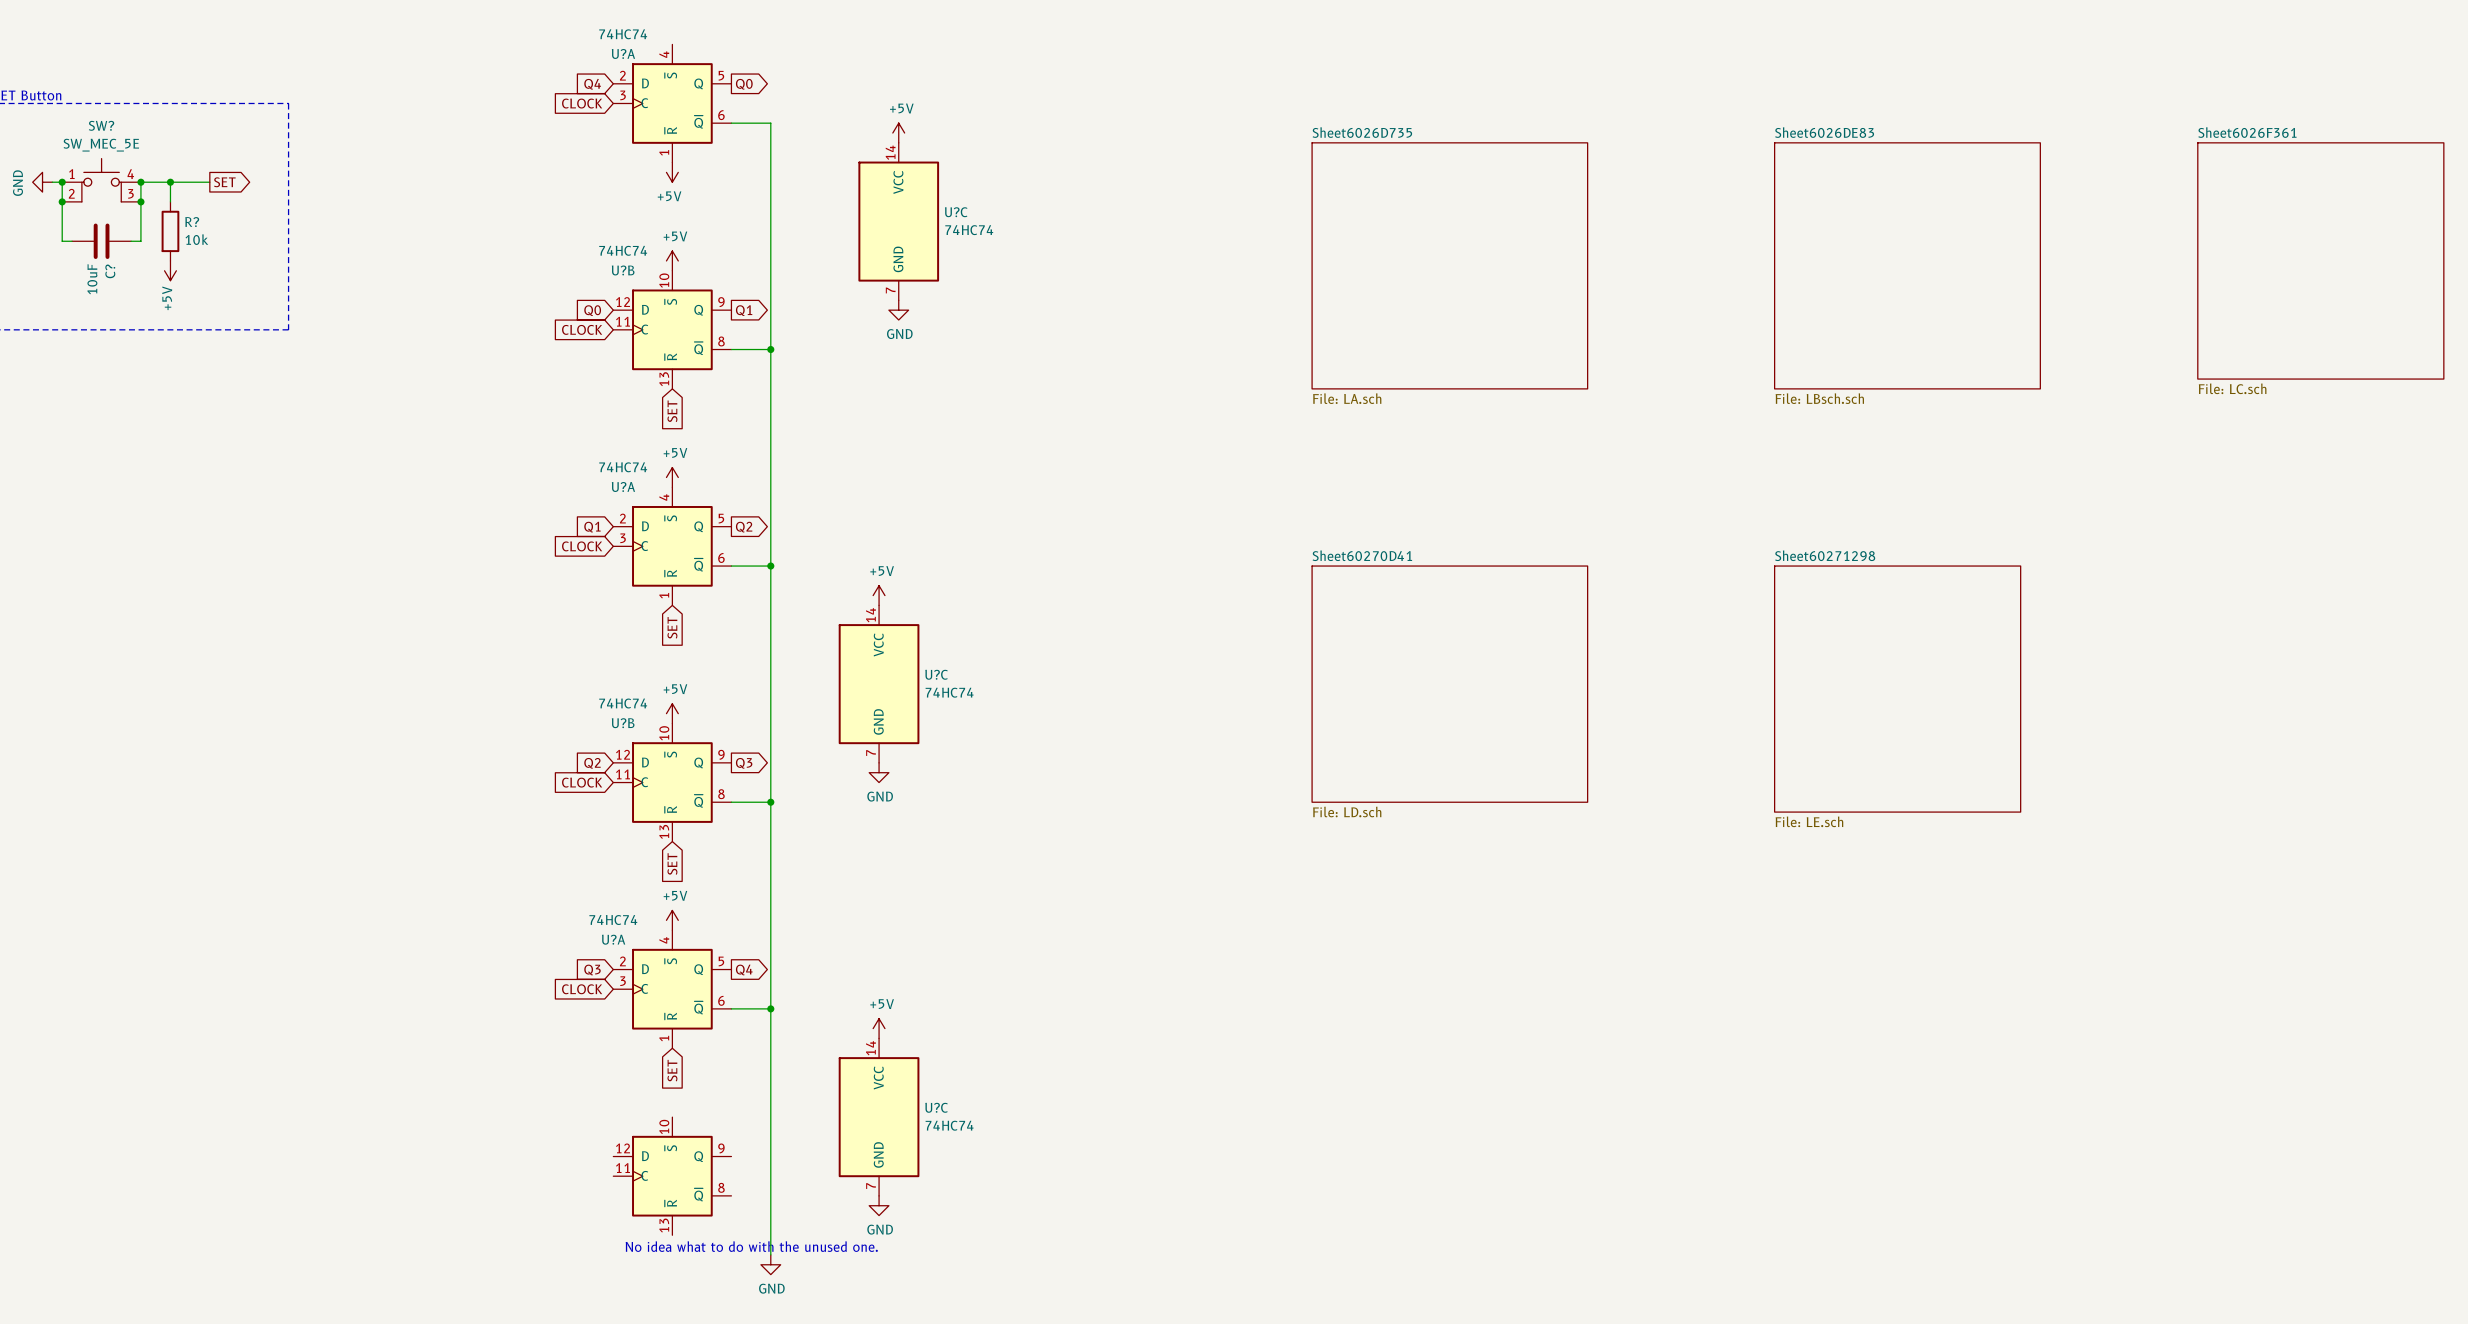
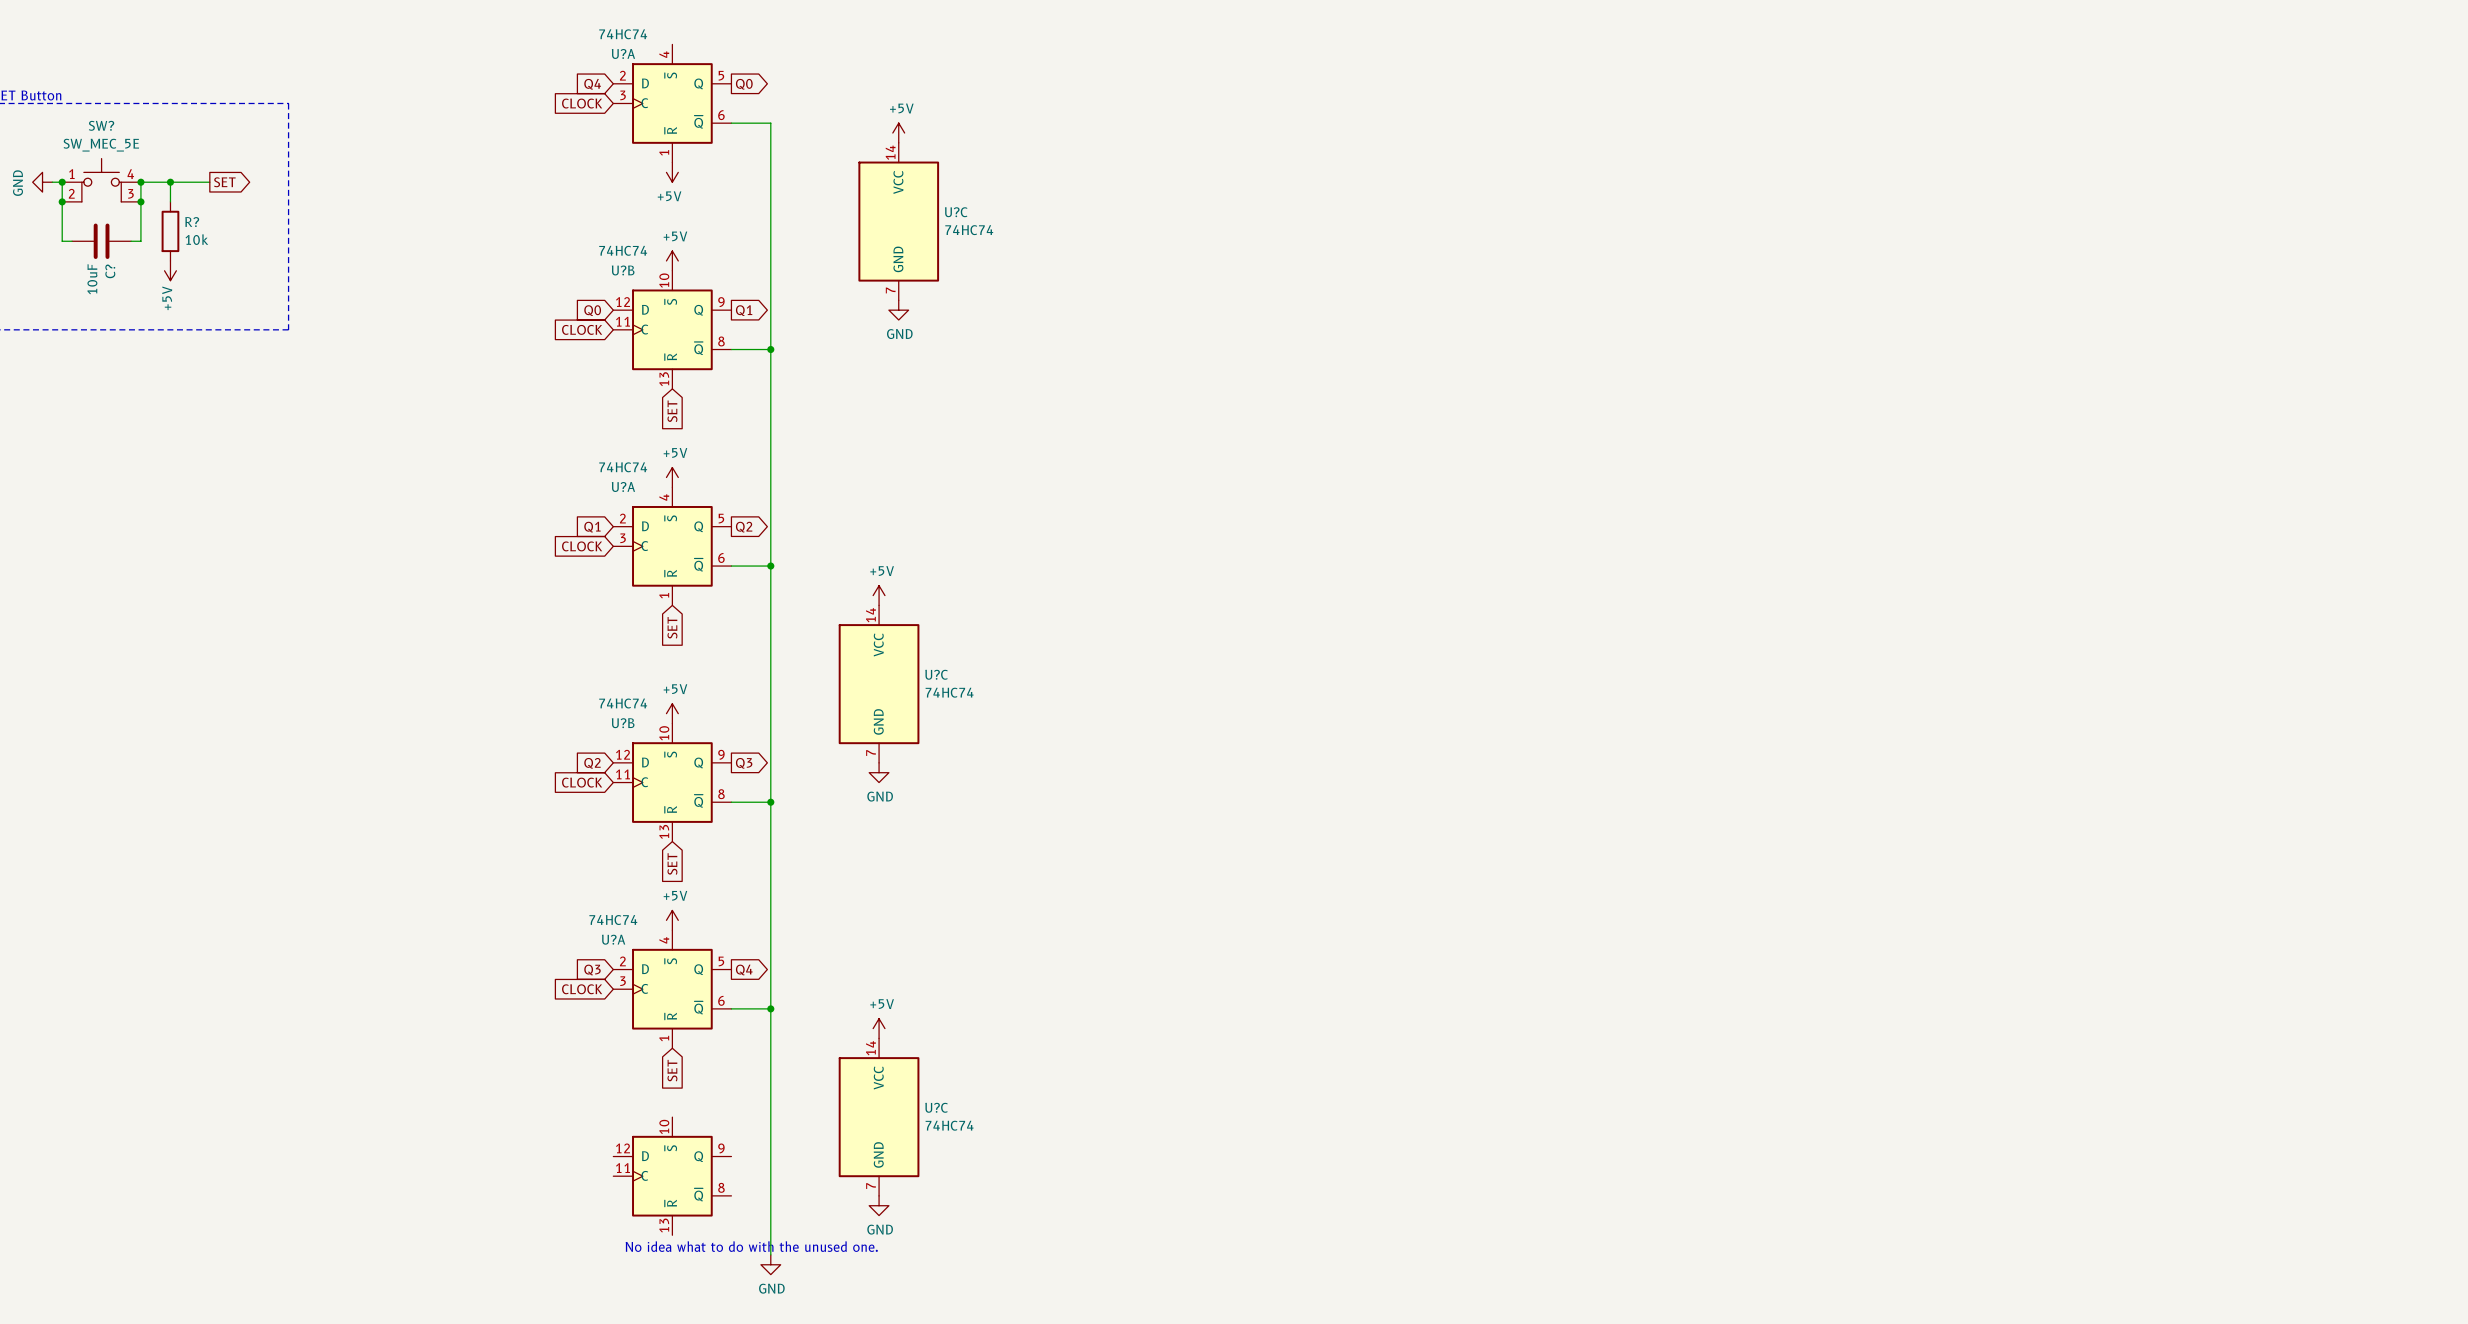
sheet Sheet6026F361: File: LC.sch (2320, 260) -> none
sheet Sheet6026D735: File: LA.sch (1449, 265) -> none
sheet Sheet6026DE83: File: LBsch.sch (1907, 265) -> none
sheet Sheet60270D41: File: LD.sch (1449, 684) -> none
sheet Sheet60271298: File: LE.sch (1897, 689) -> none

